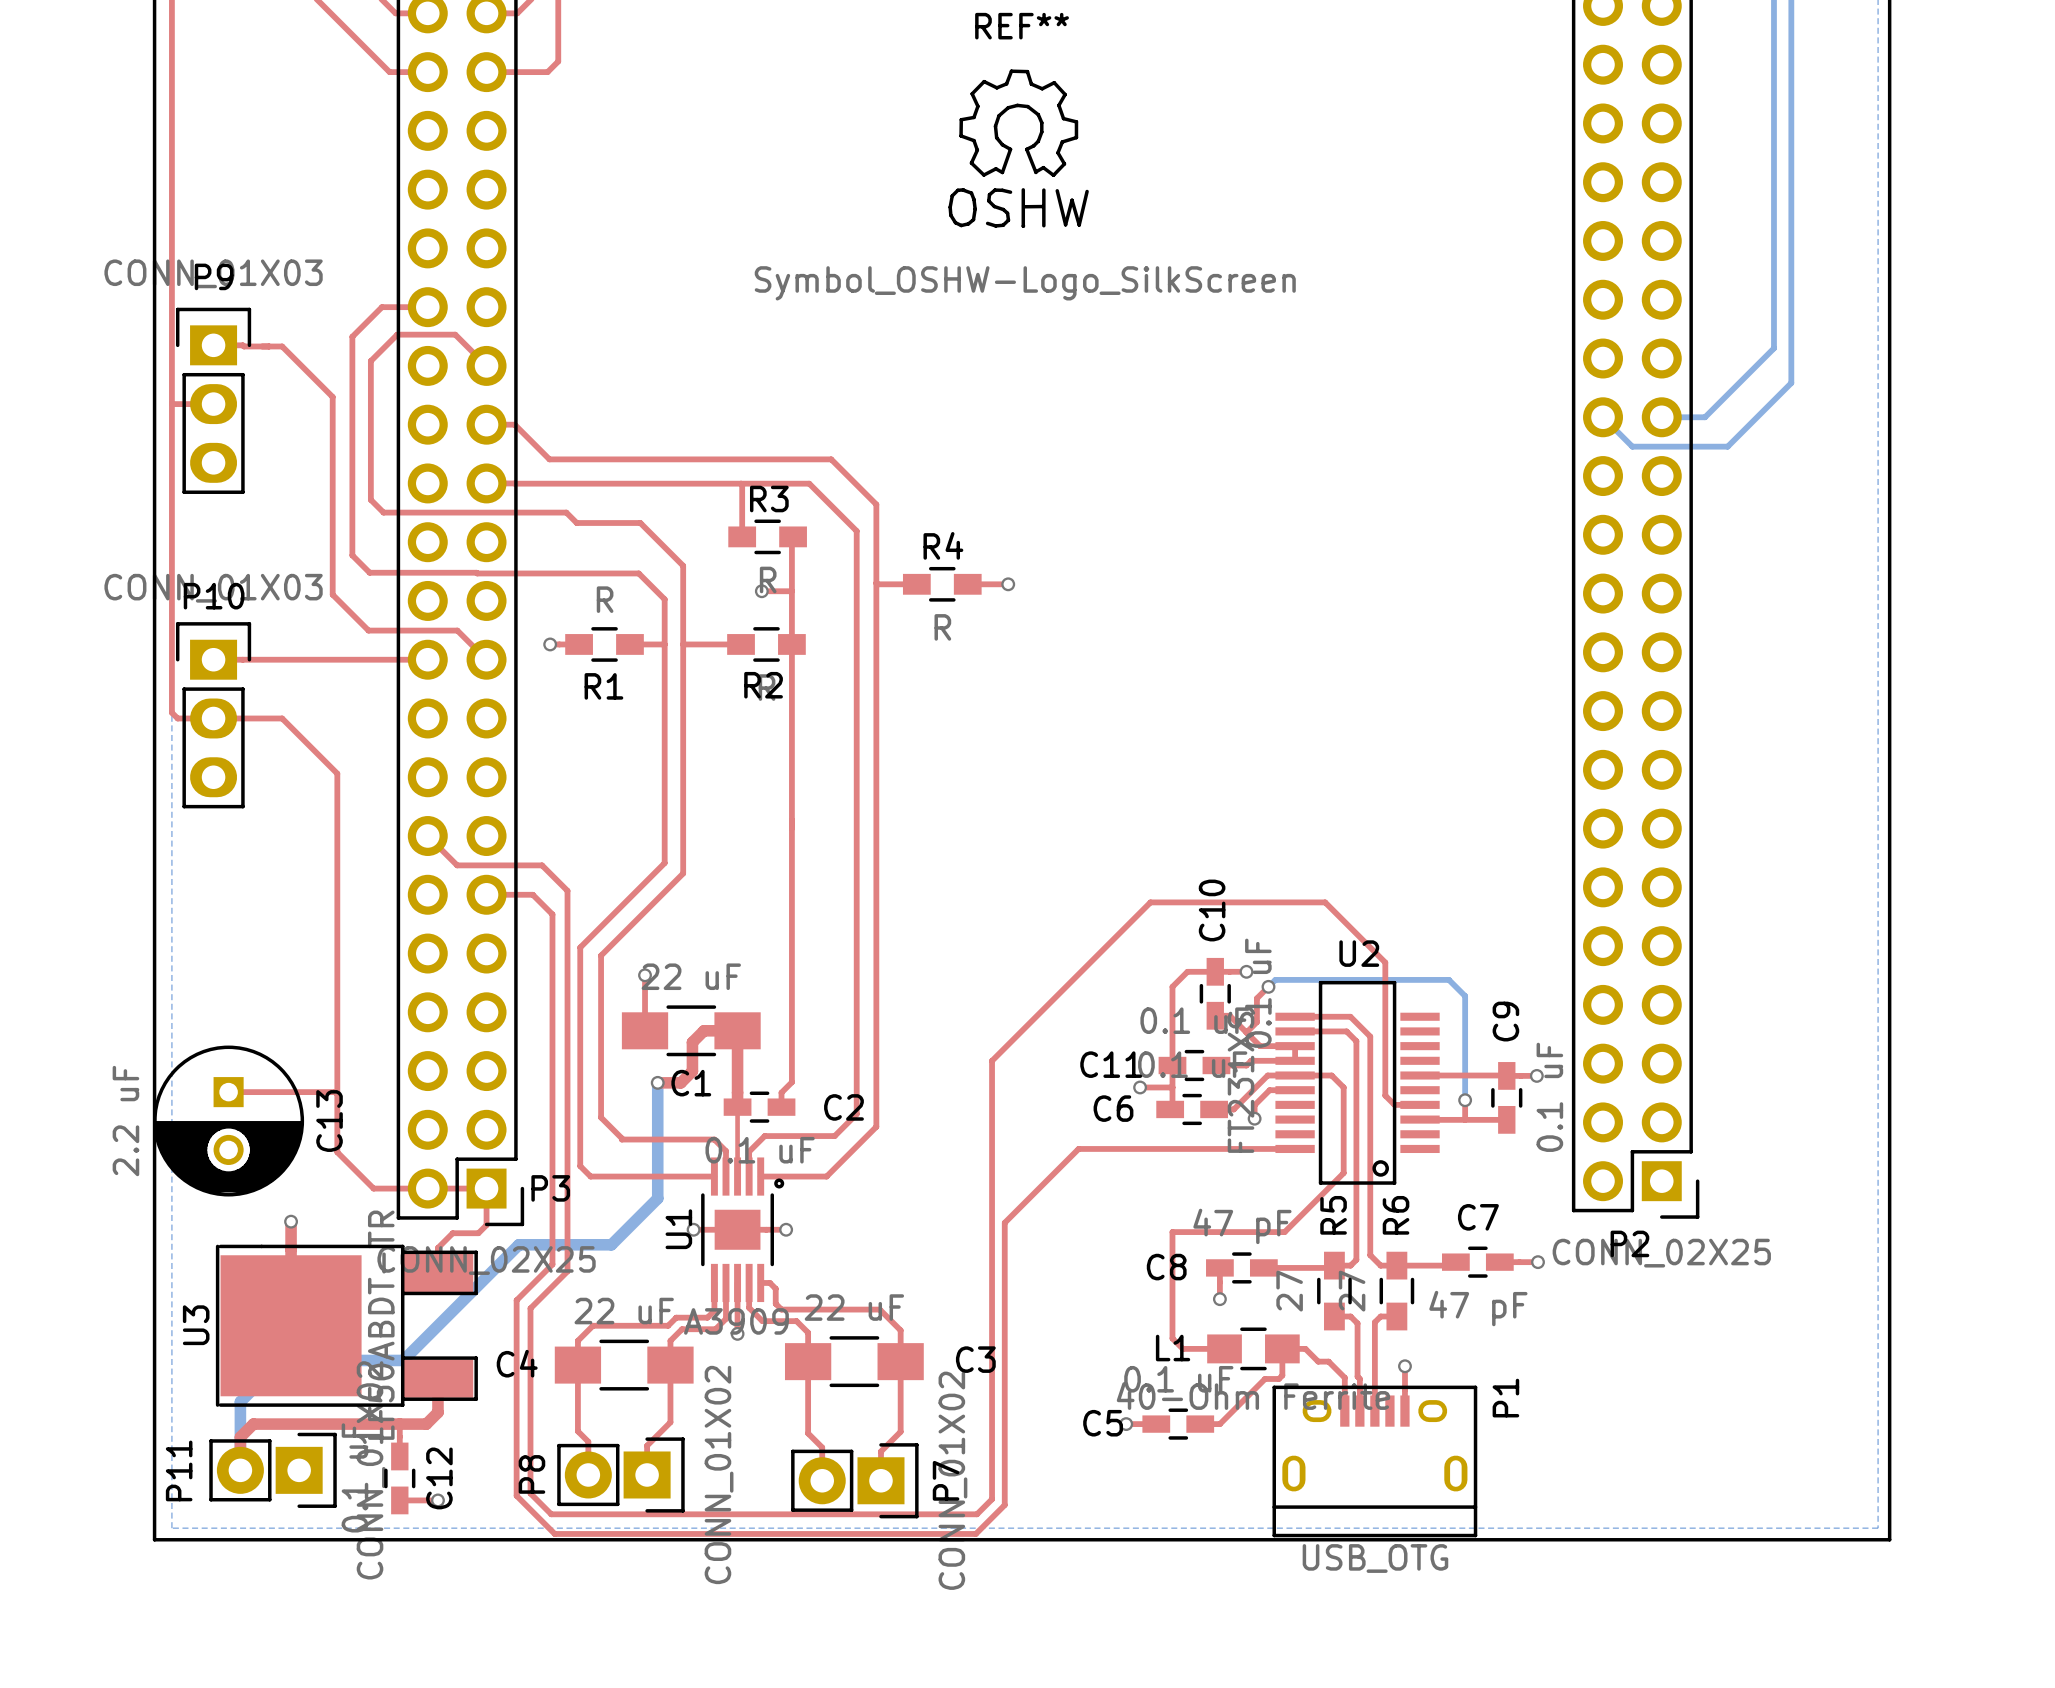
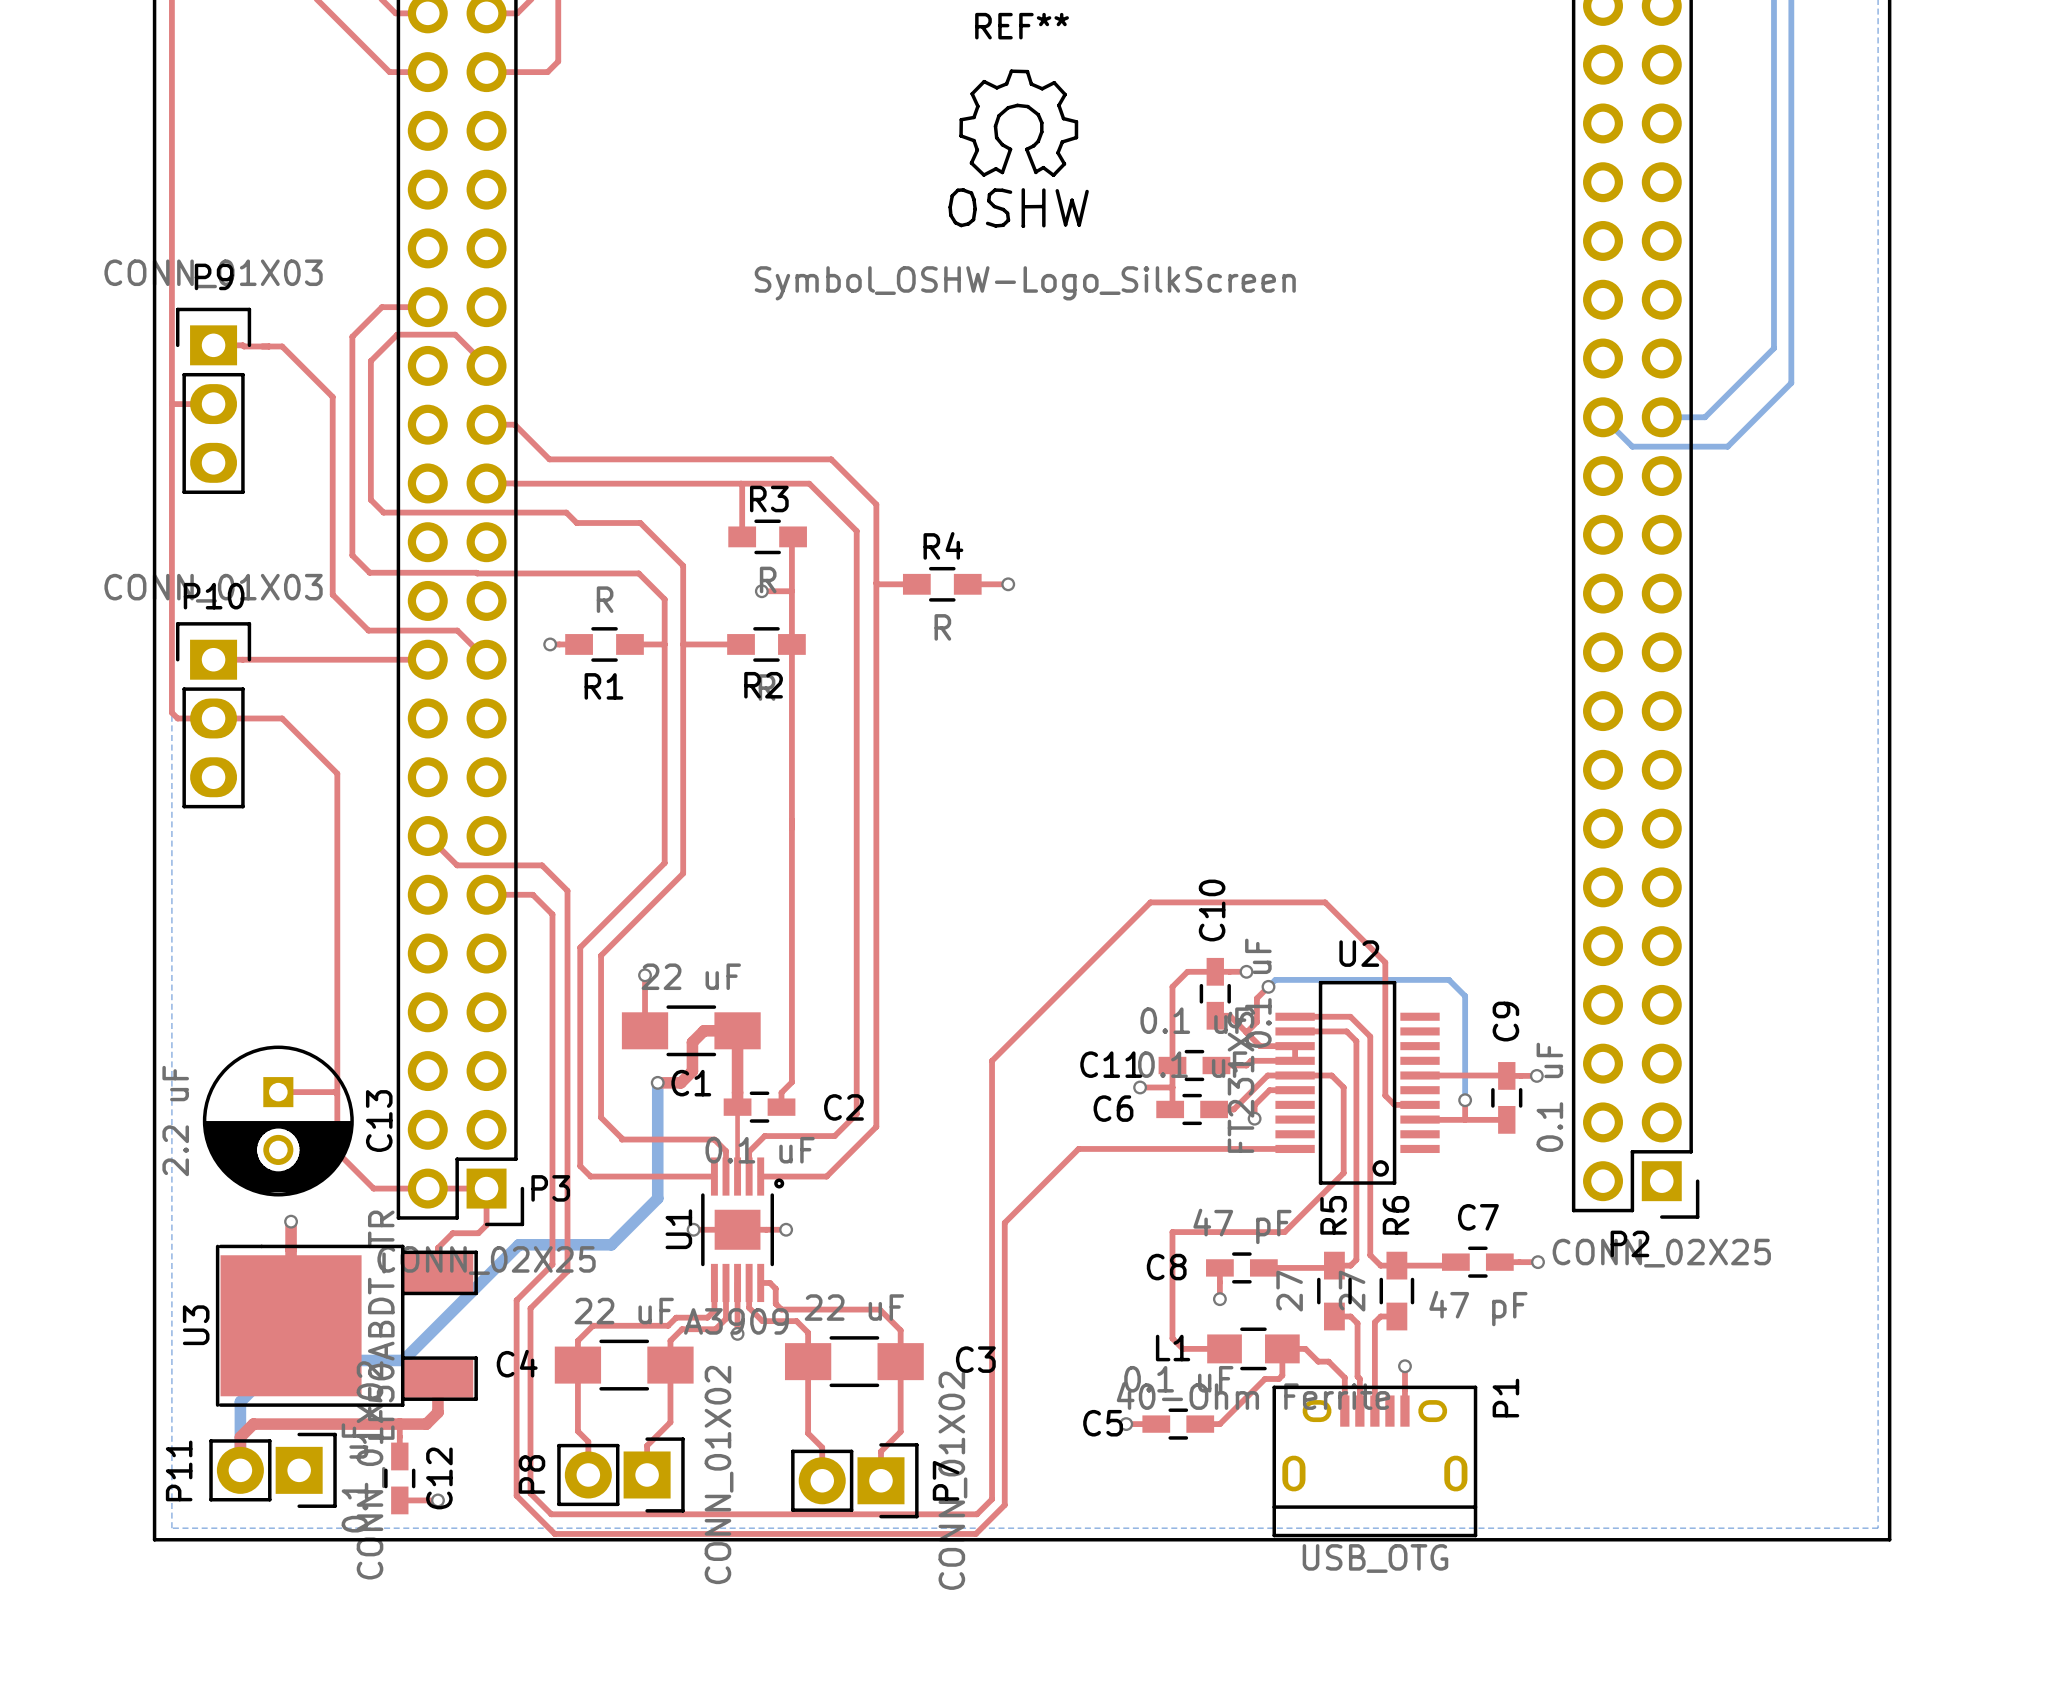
top track: (228, 1092) (278, 1092) -> none
C13 position: (228, 1121) -> (278, 1121)

